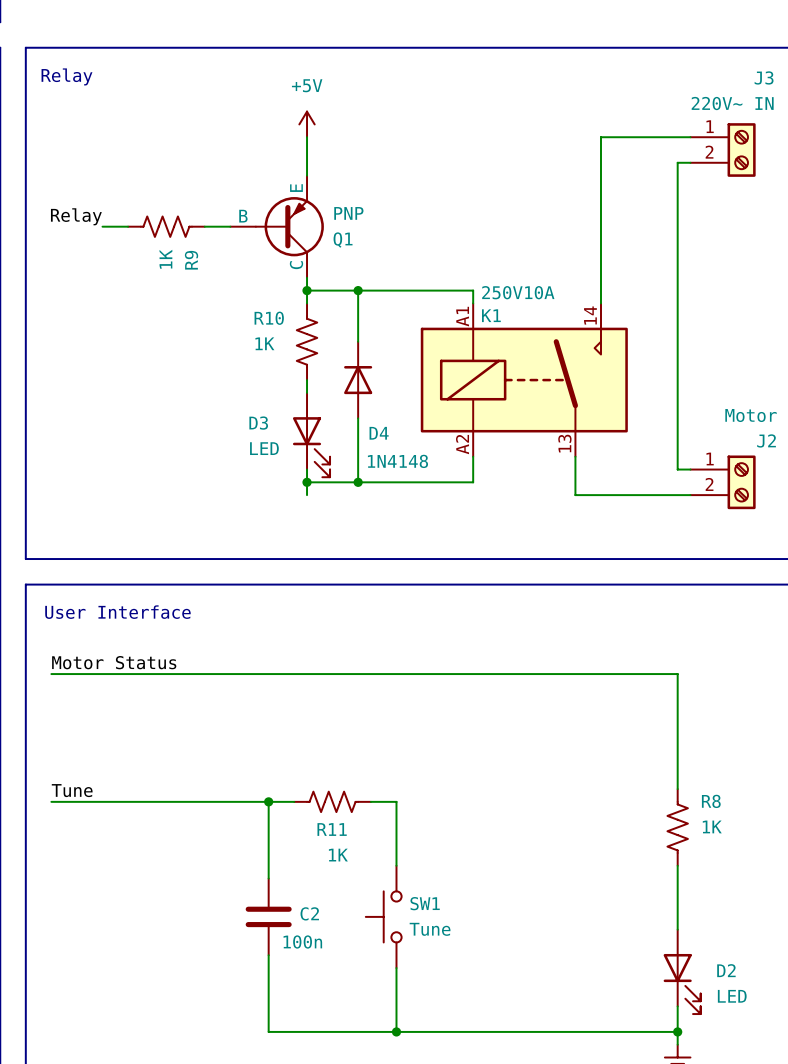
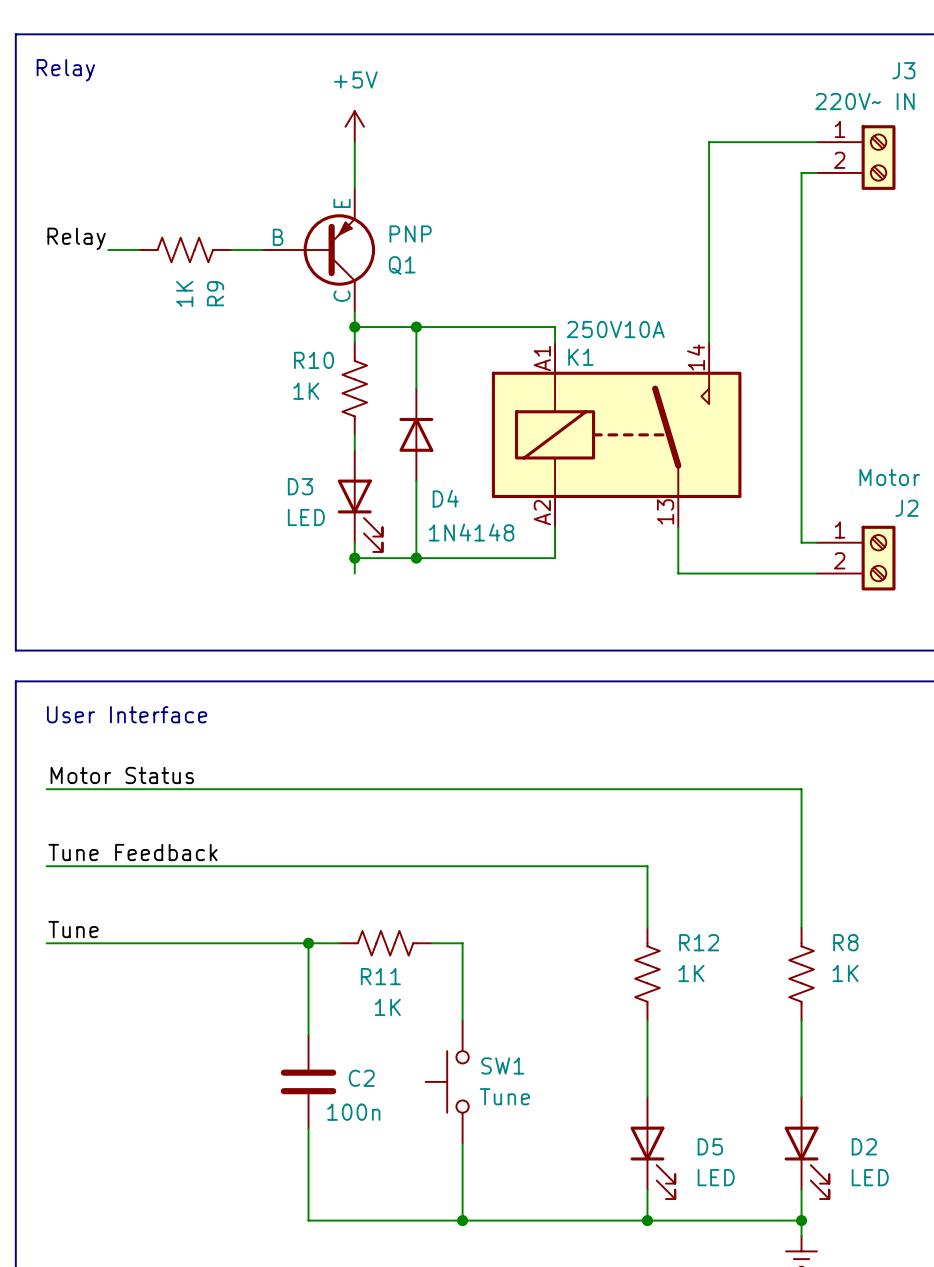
label: none -> Tune Feedback (132, 852)
wire: none -> (46, 866) (647, 866) (647, 927)
R12: none -> 1K (647, 974)
wire: none -> (647, 1020) (647, 1097)
D5: none -> LED (652, 1148)
wire: none -> (647, 1189) (647, 1220)
junction: none -> (647, 1220)

